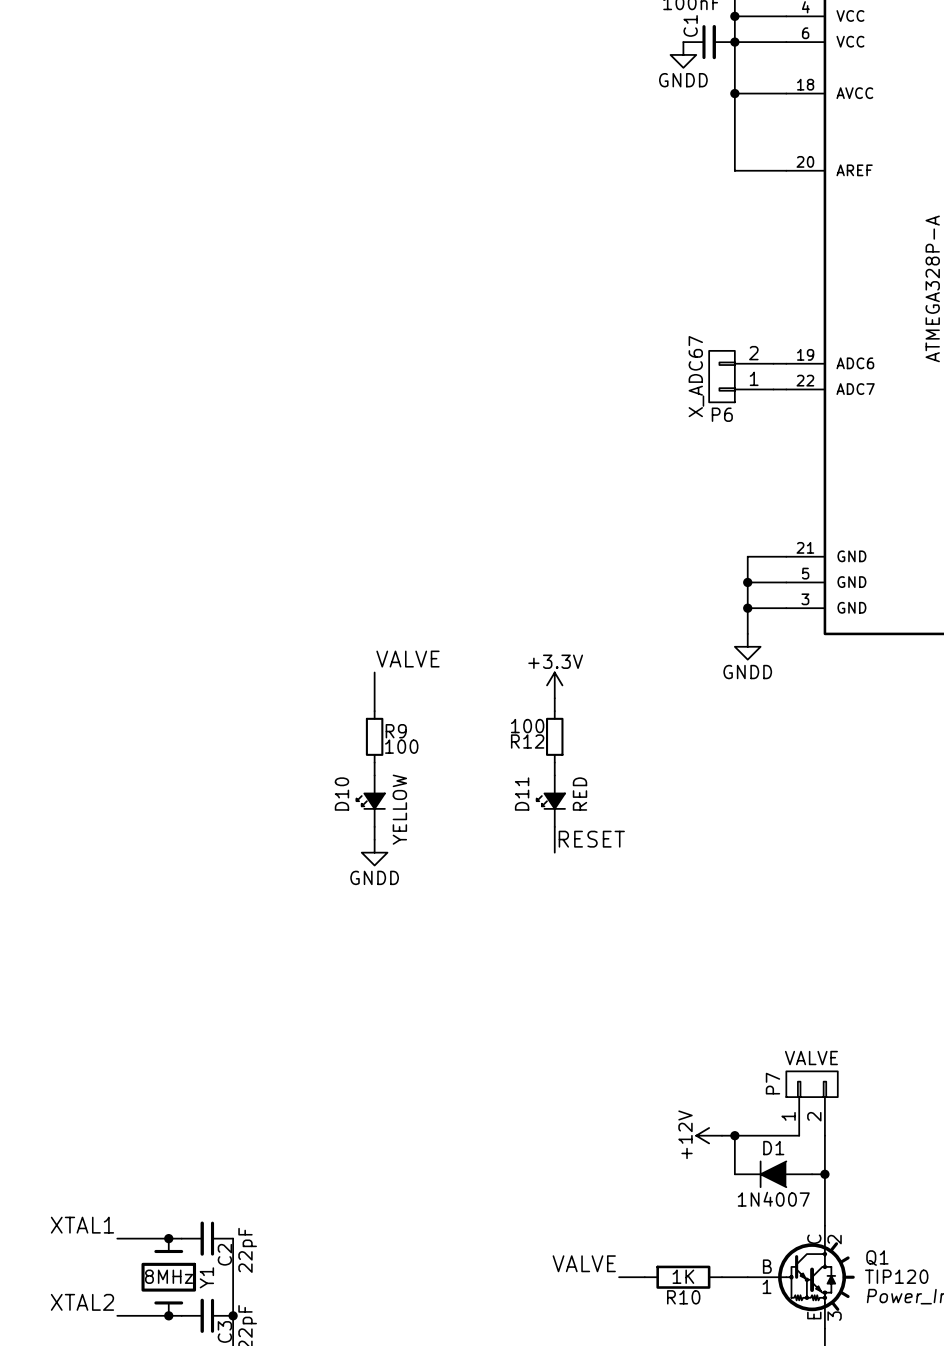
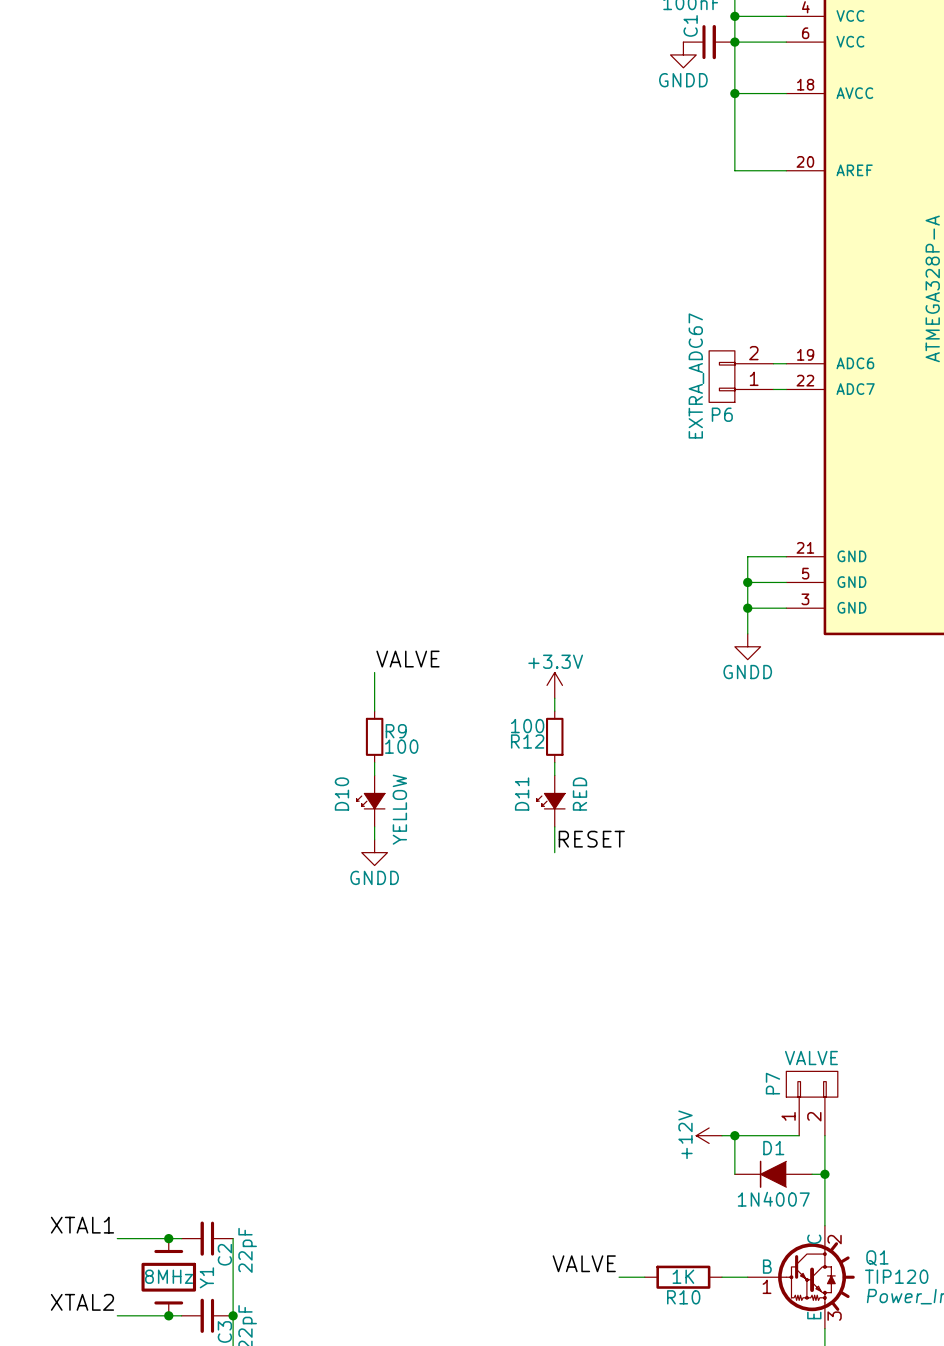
P6 value: X_ADC67 (696, 376) -> EXTRA_ADC67 (696, 375)

